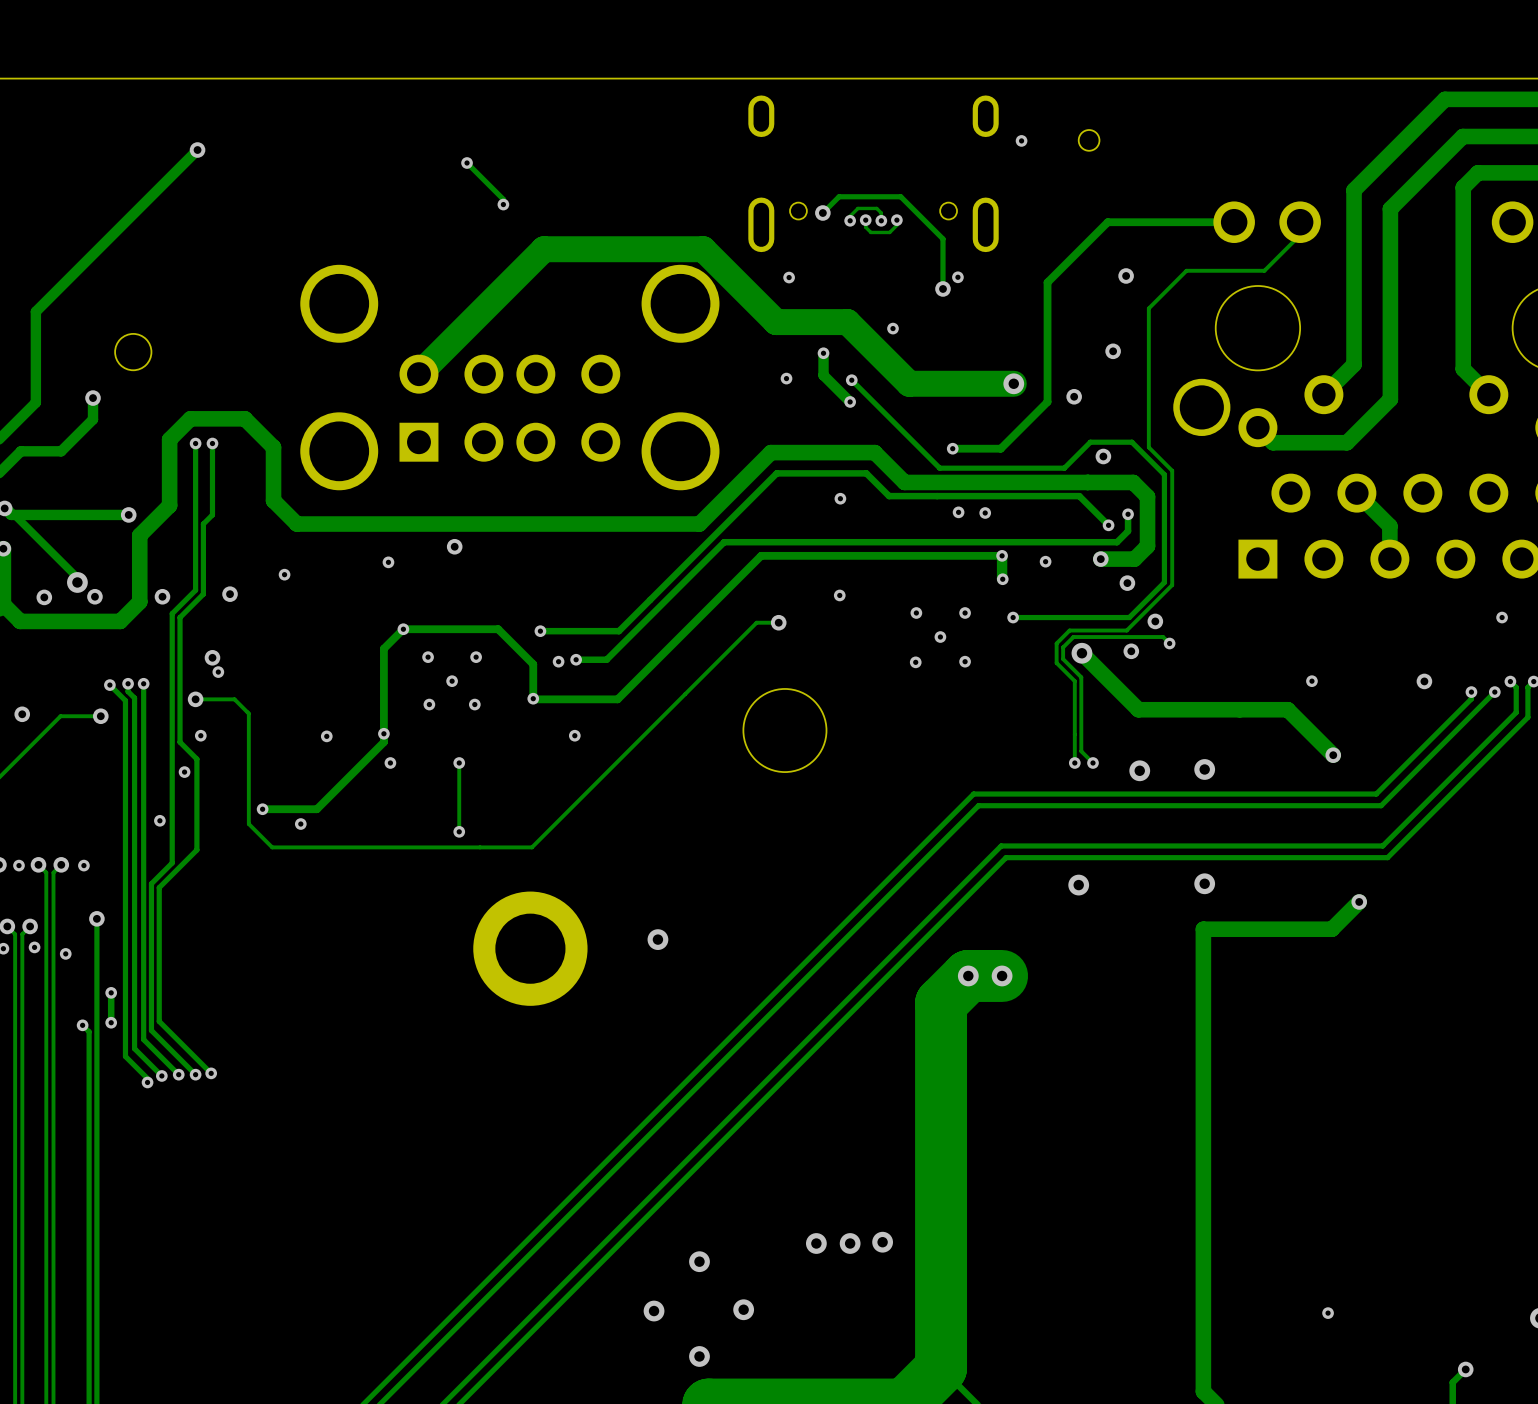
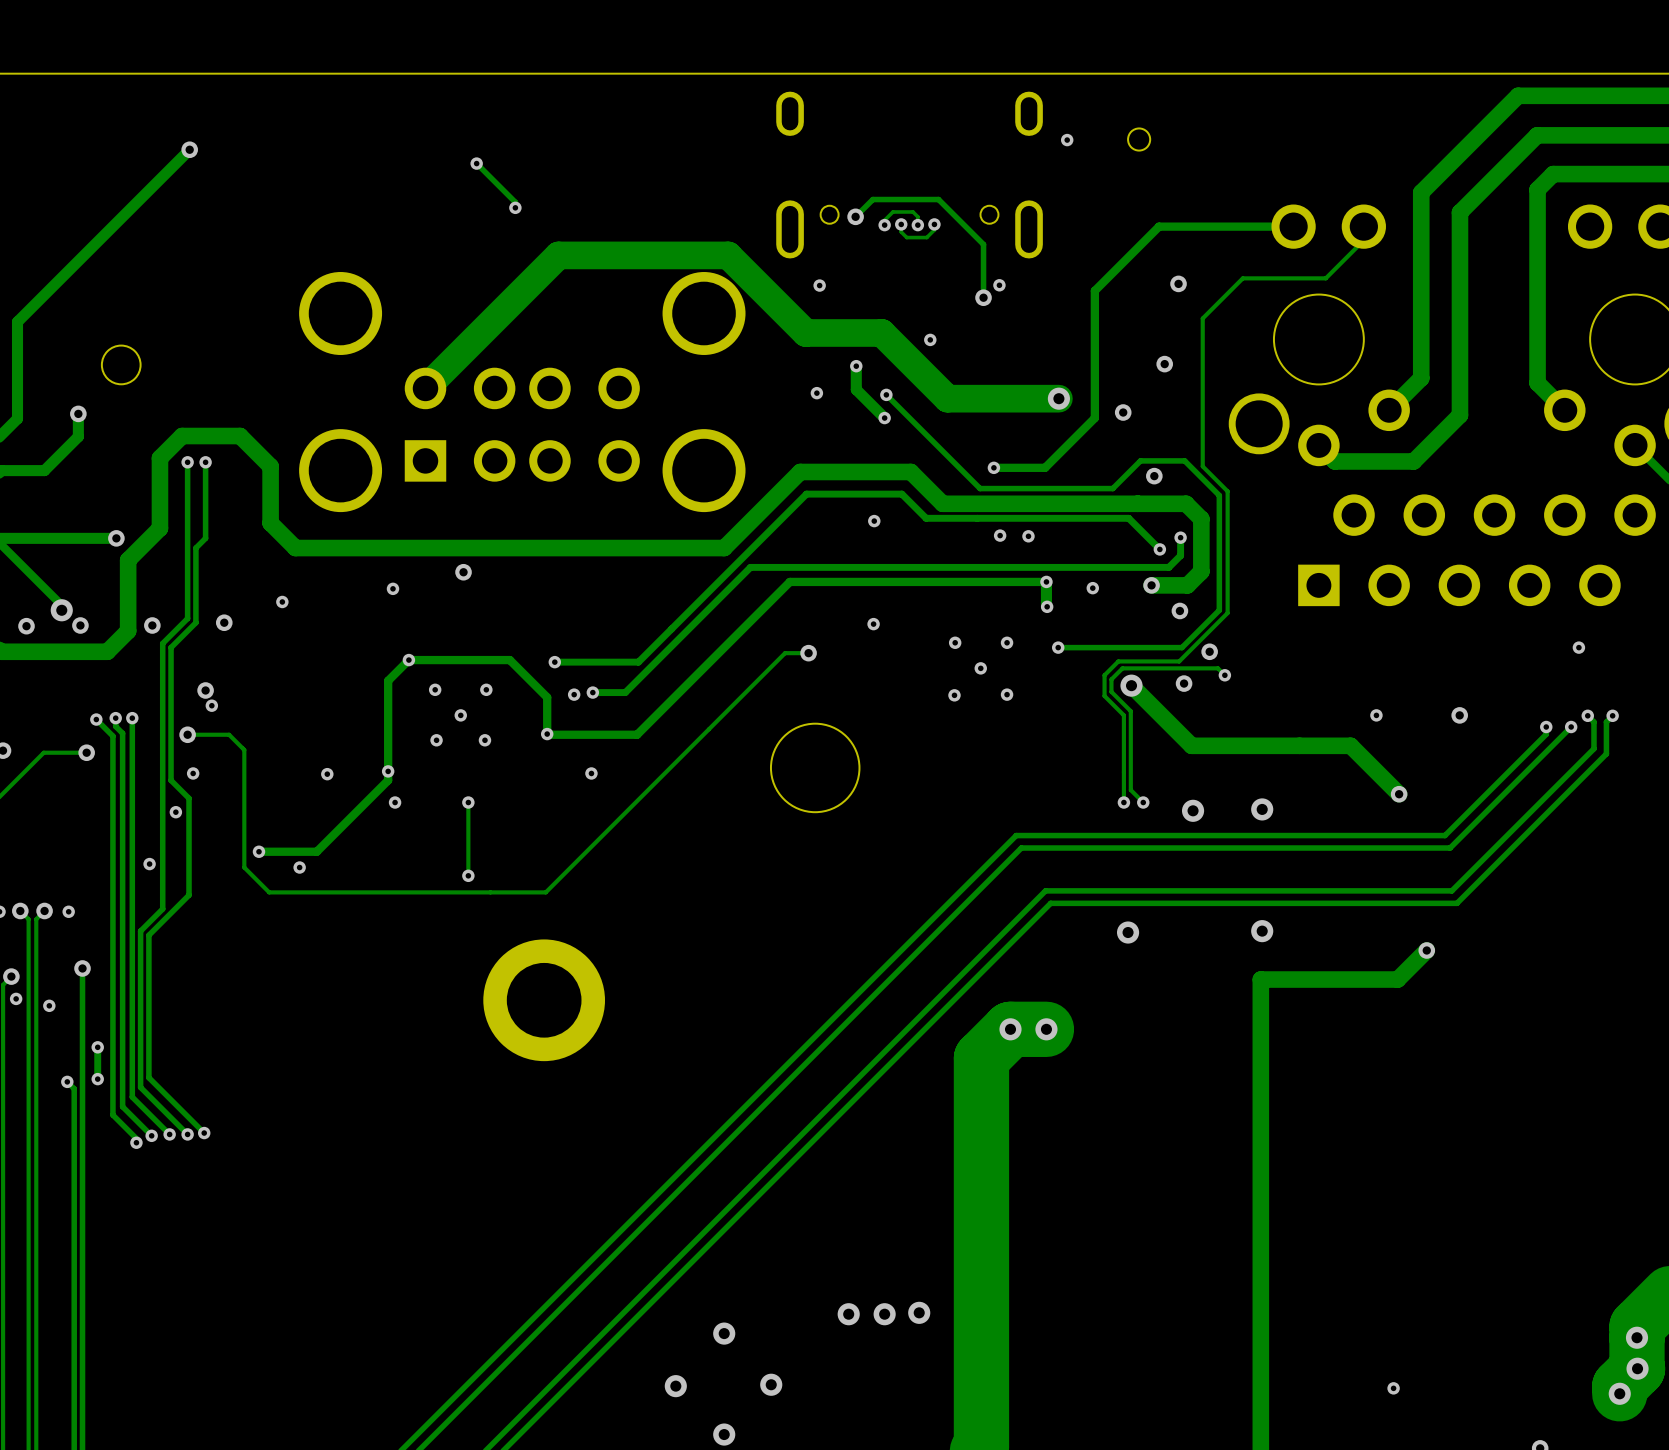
track: (1356, 493) (1389, 526) (1389, 559) -> none
via position: (1424, 681) -> (1459, 715)
via: (657, 939) -> none

